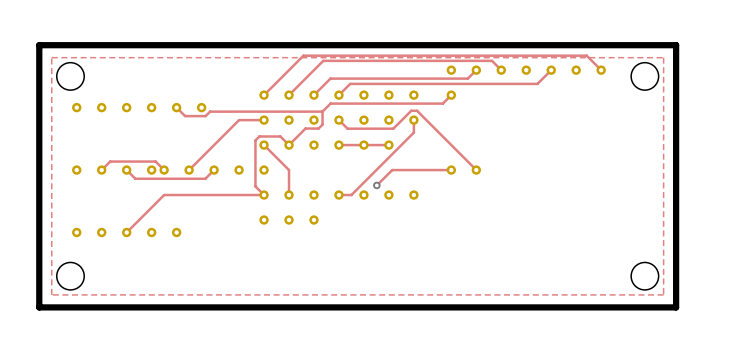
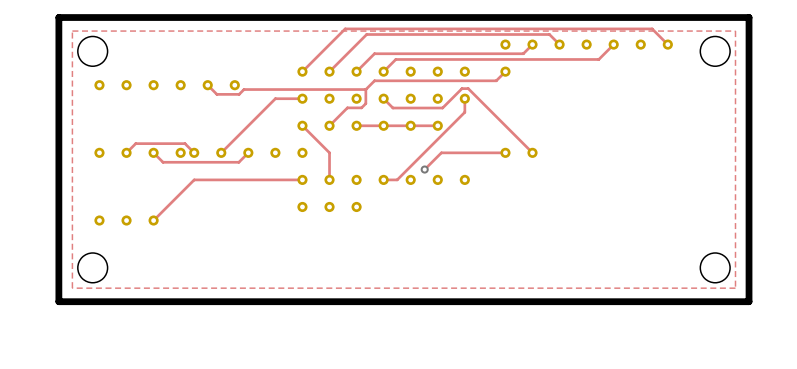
track: (289, 145) (280, 136) (259, 136) (255, 140) (255, 186) (264, 195) -> none
track: none -> (356, 125) (383, 125)
part: (164, 232) -> none

